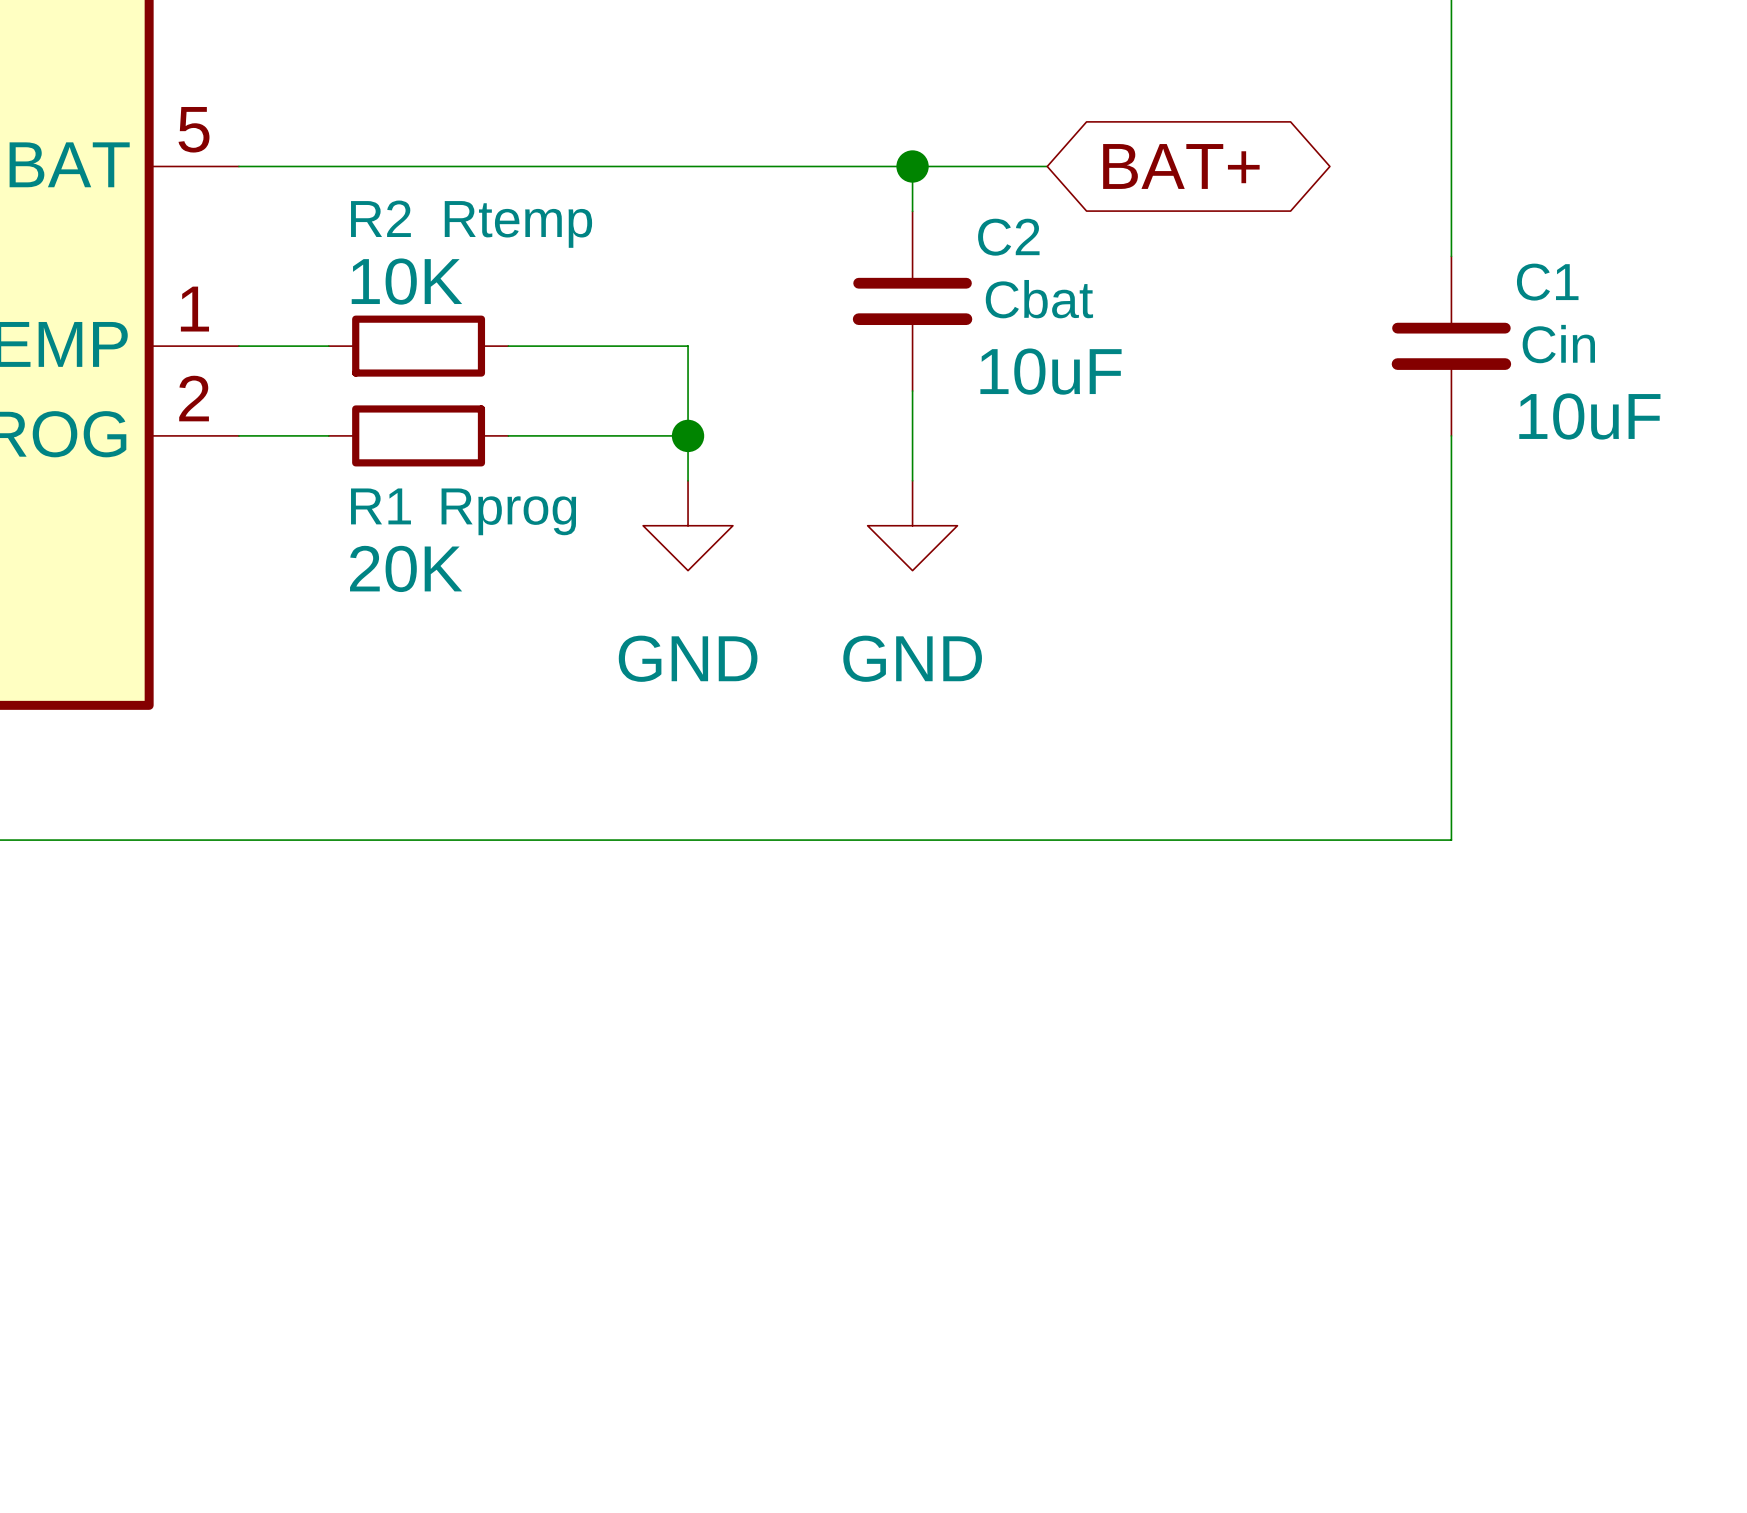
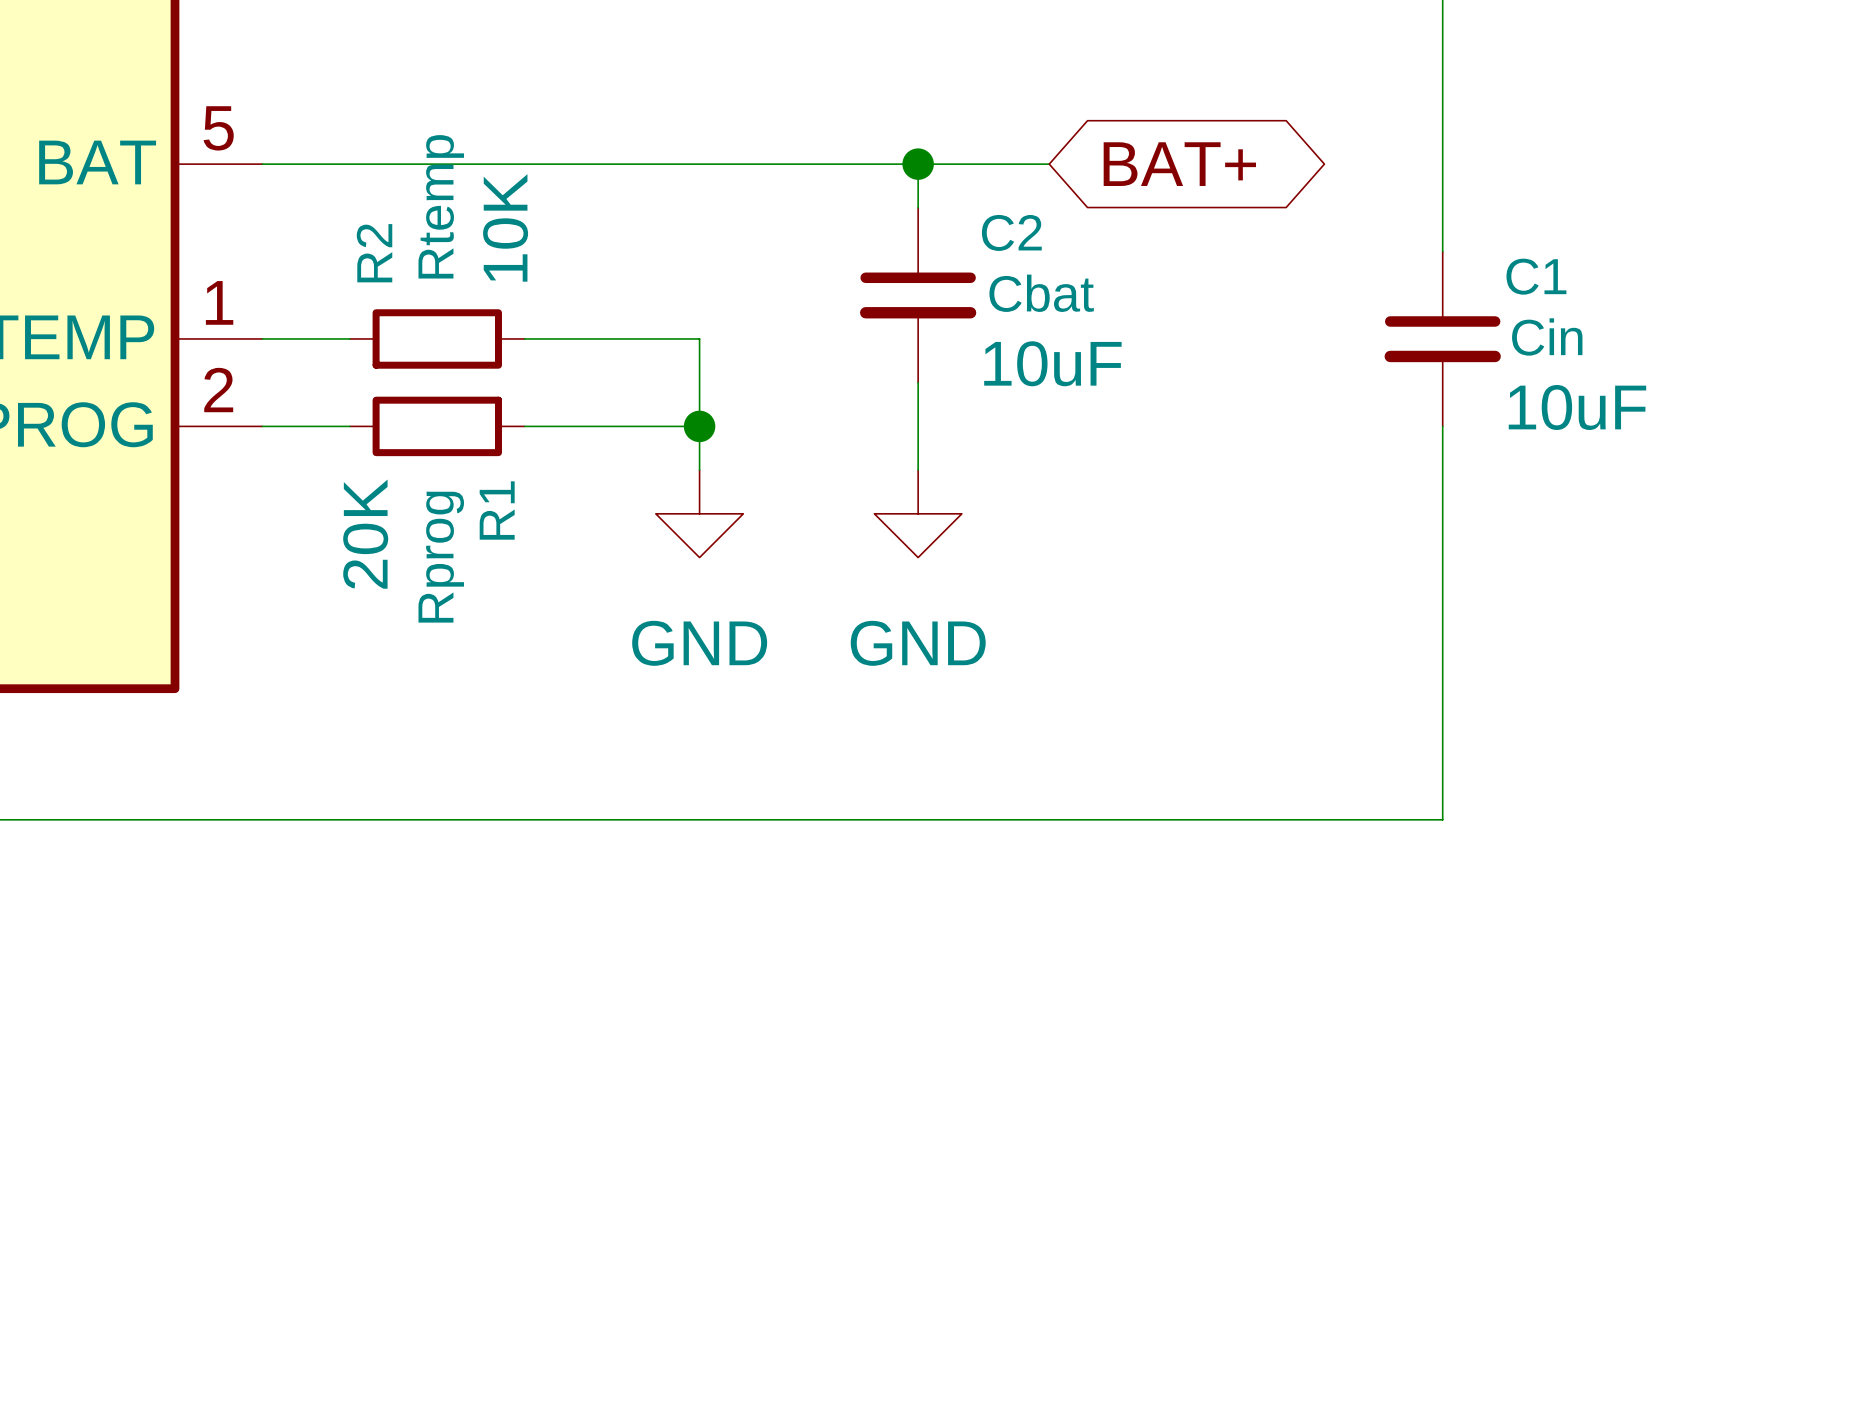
R2 name rotation: 0° (380, 218) -> 90° counterclockwise (374, 253)
R2 text rotation: 0° (518, 224) -> 90° counterclockwise (441, 206)
R2 value rotation: 0° (406, 281) -> 90° counterclockwise (505, 227)
R1 name rotation: 0° (380, 506) -> 90° counterclockwise (497, 510)
R1 name position: R1 (380, 506) -> R1 (497, 510)
R1 text rotation: 0° (508, 511) -> 90° counterclockwise (441, 557)
R1 value rotation: 0° (406, 568) -> 90° counterclockwise (365, 534)

